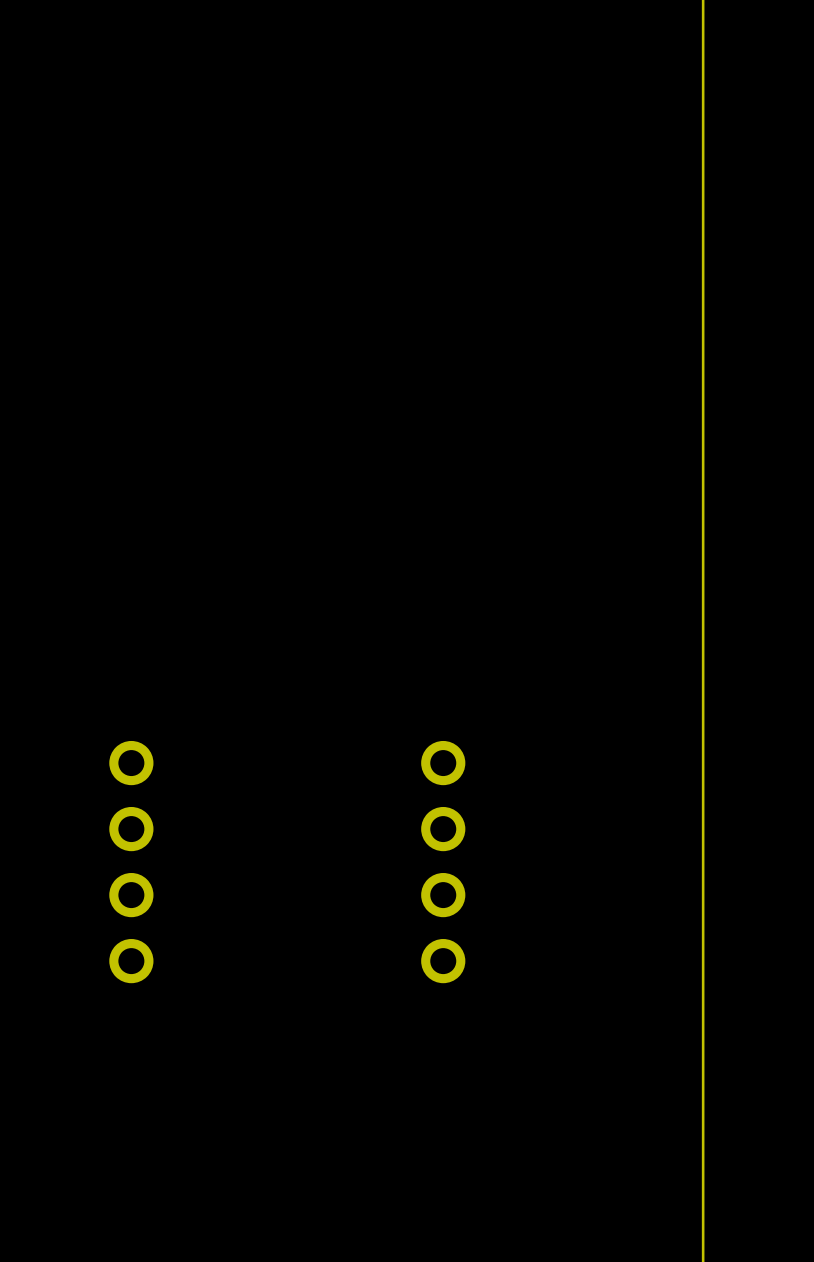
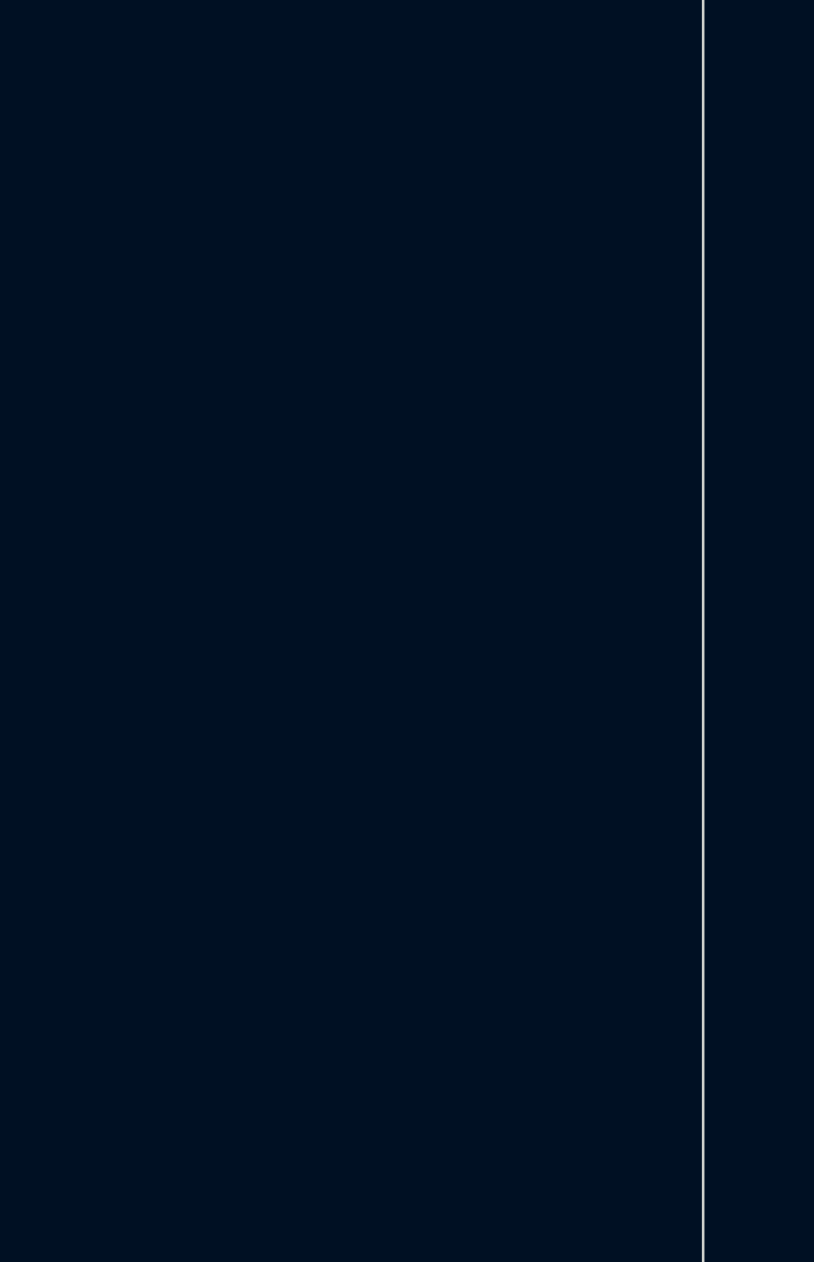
part: (131, 862) -> none
part: (443, 862) -> none

